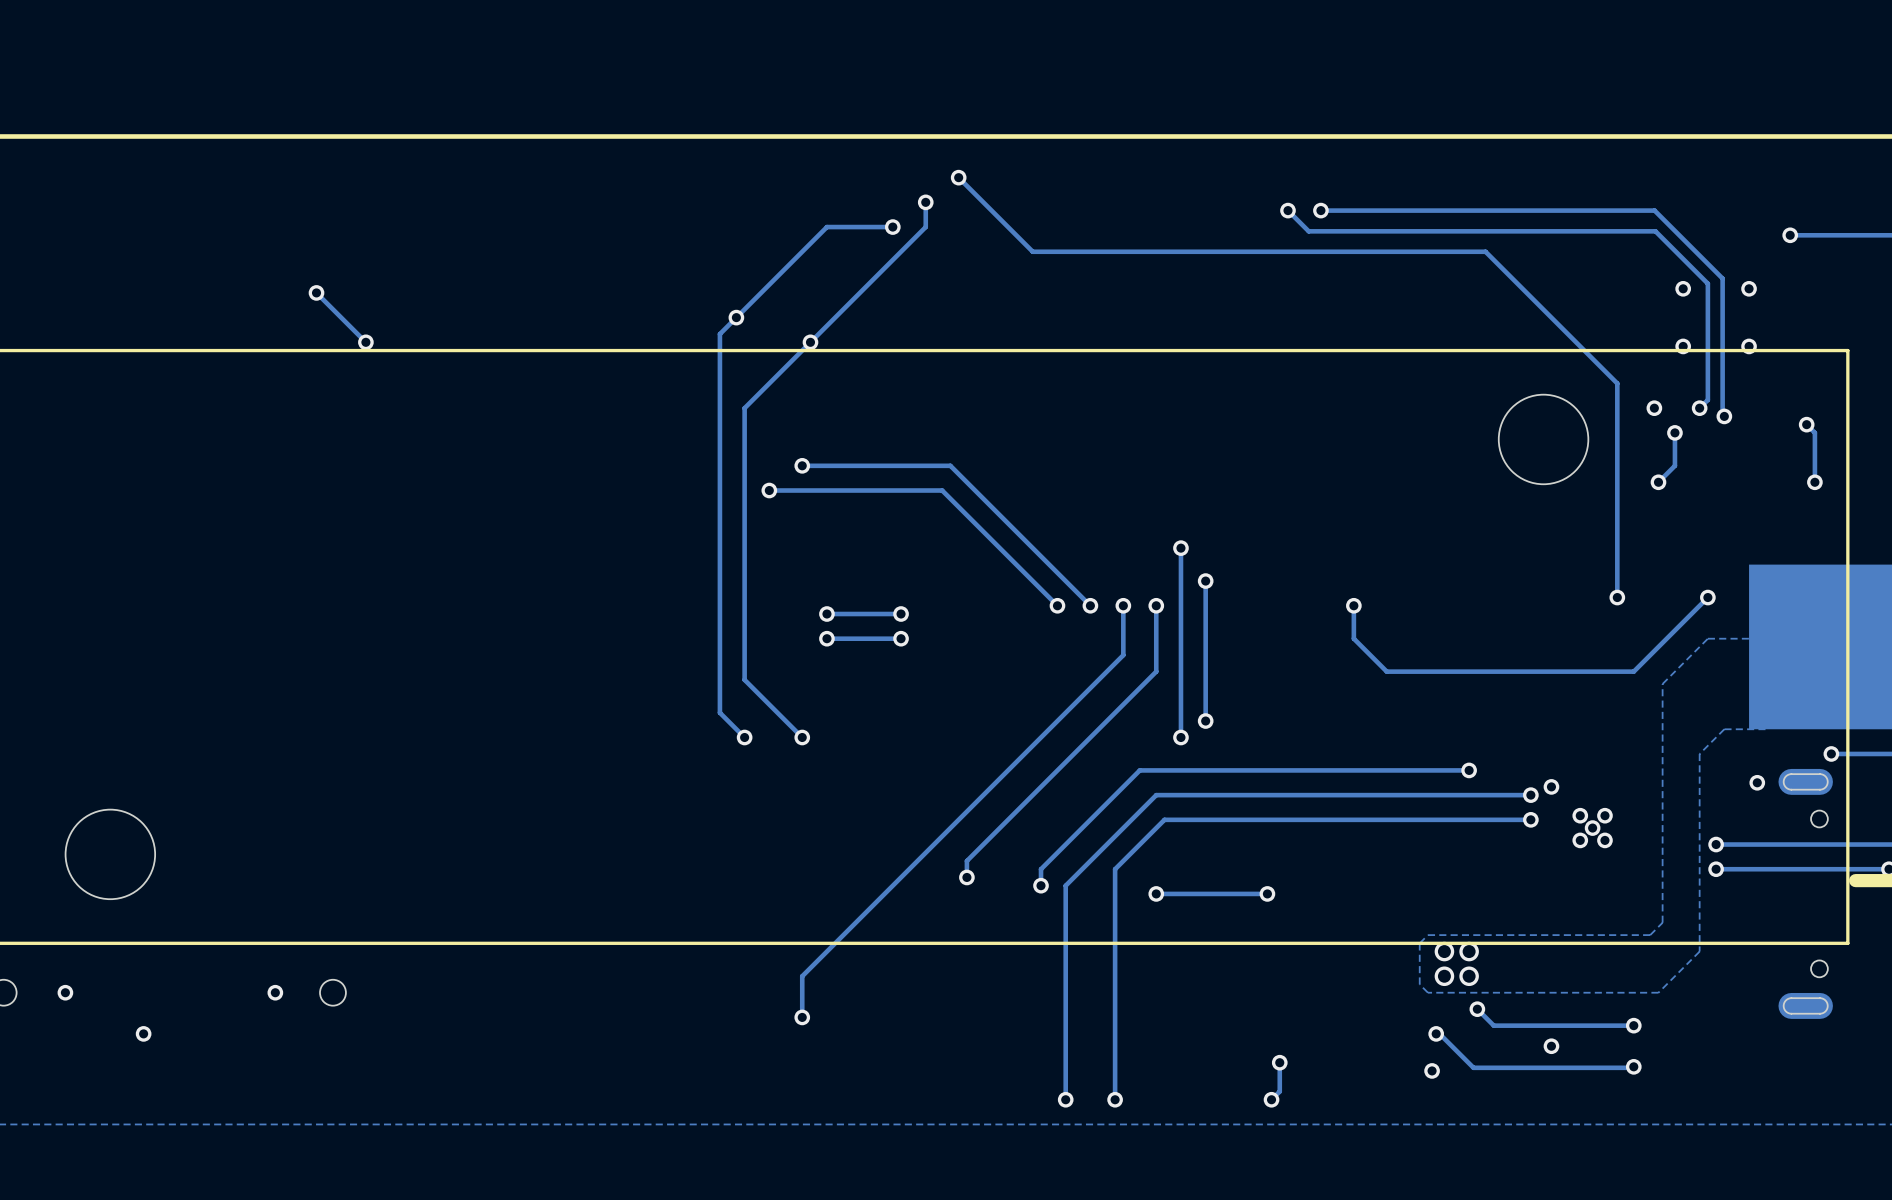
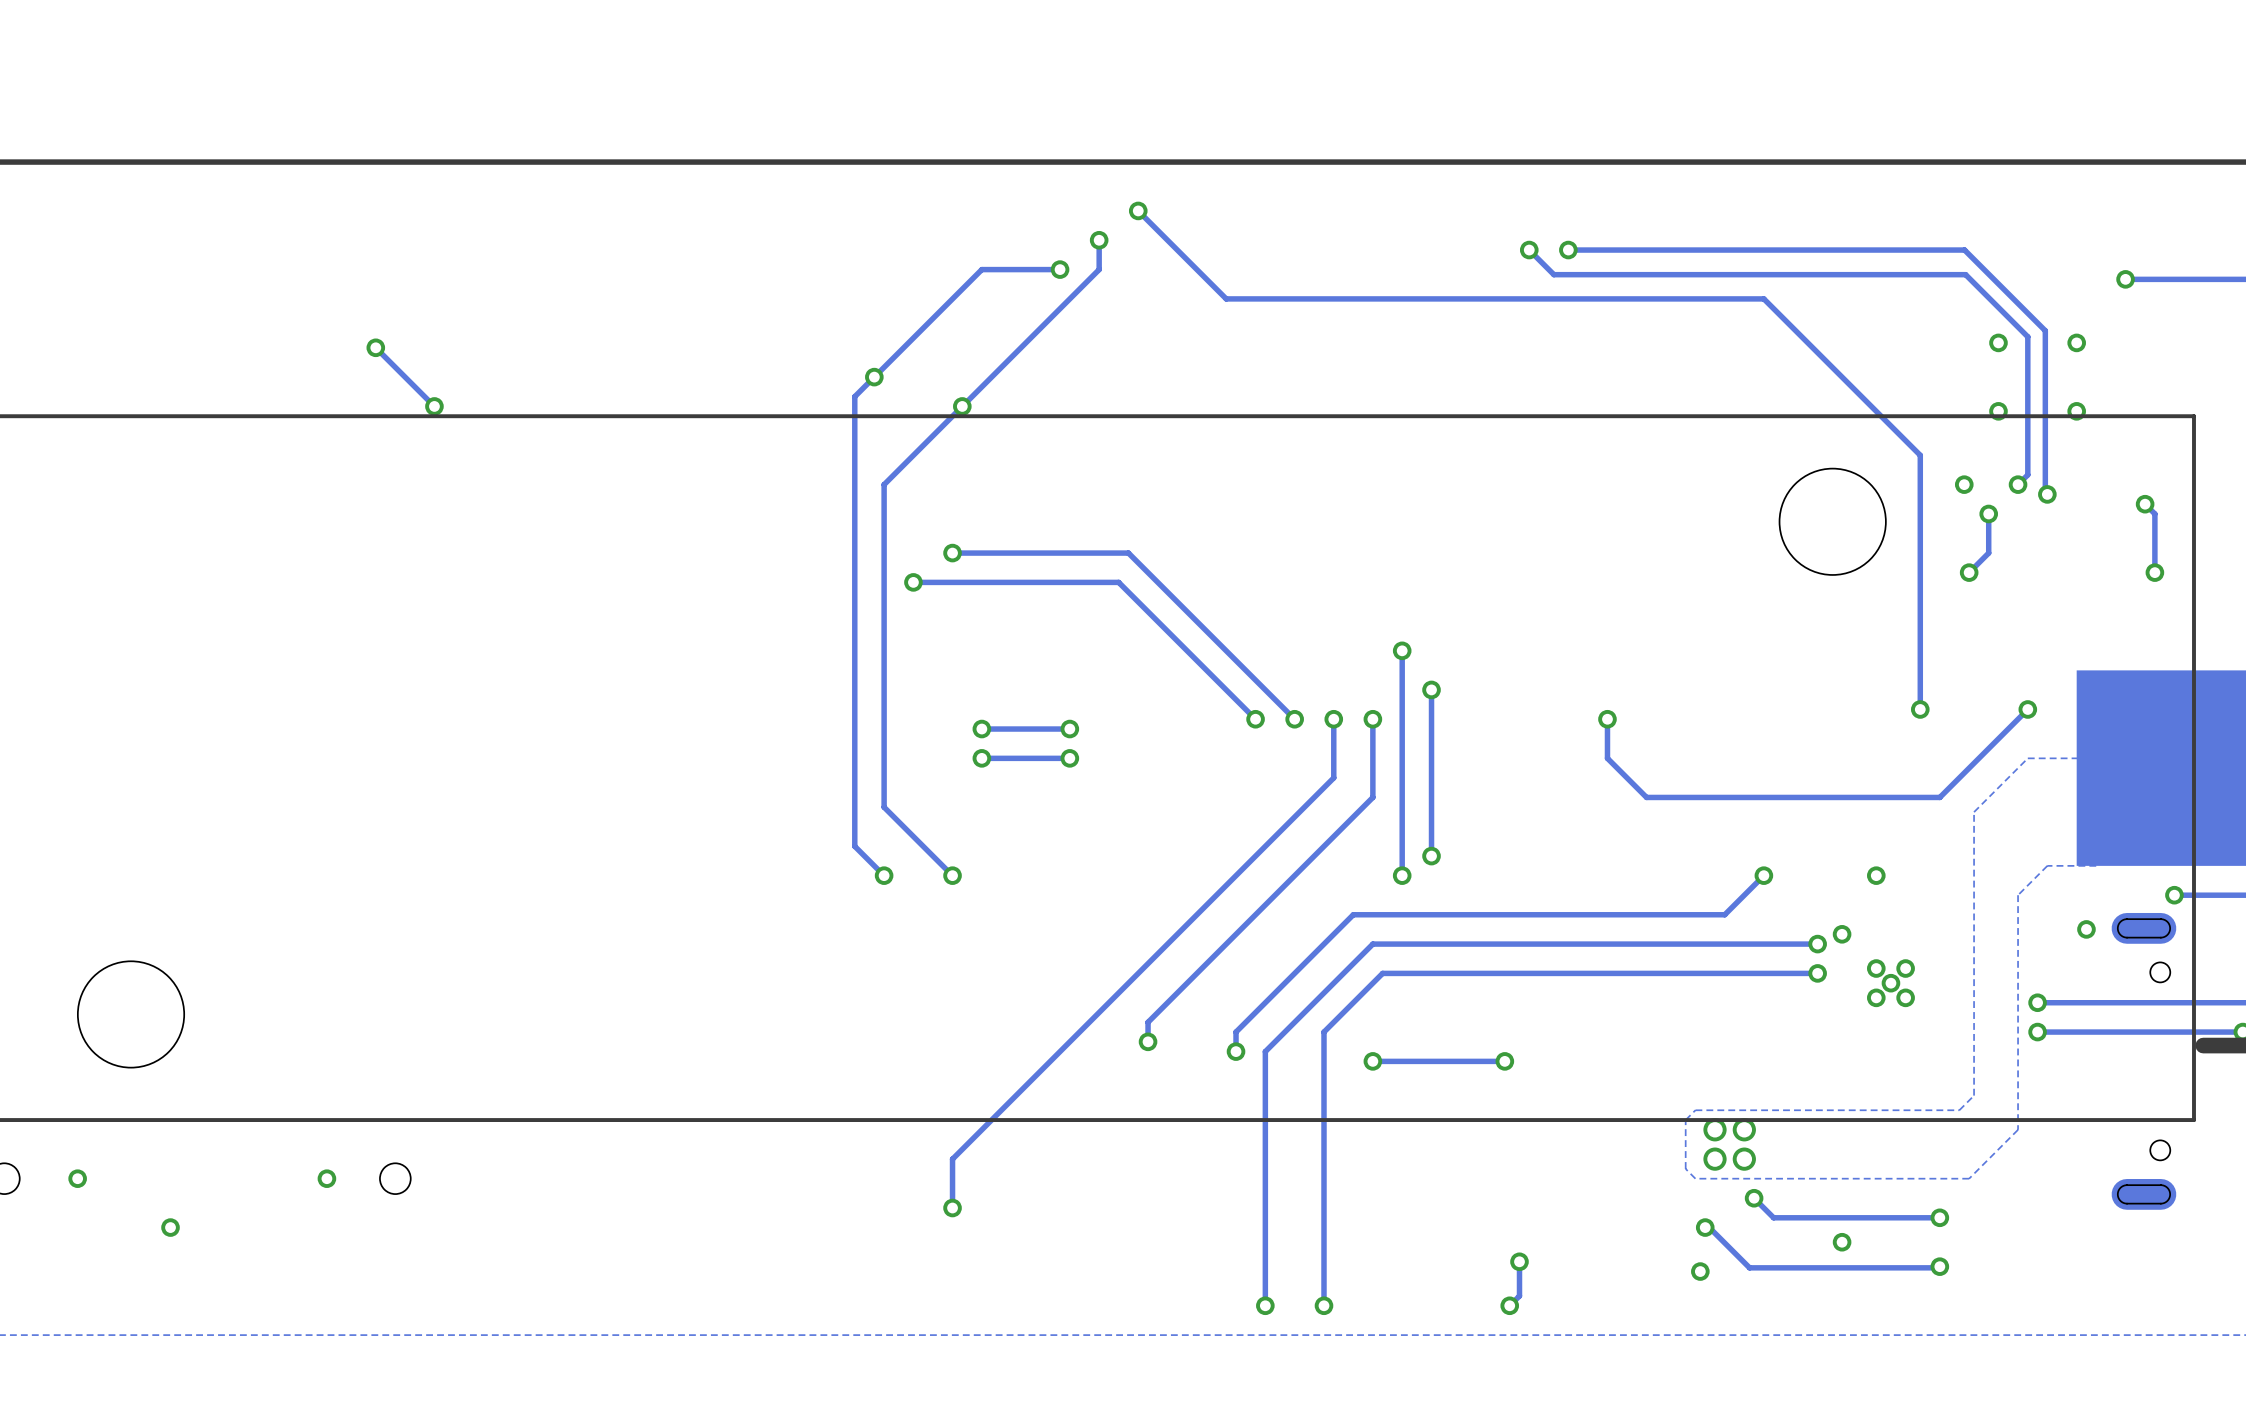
via: none -> (1876, 875)
track: (1469, 770) (1452, 770) -> (1763, 875) (1724, 914)
via position: (1469, 770) -> (1763, 875)

